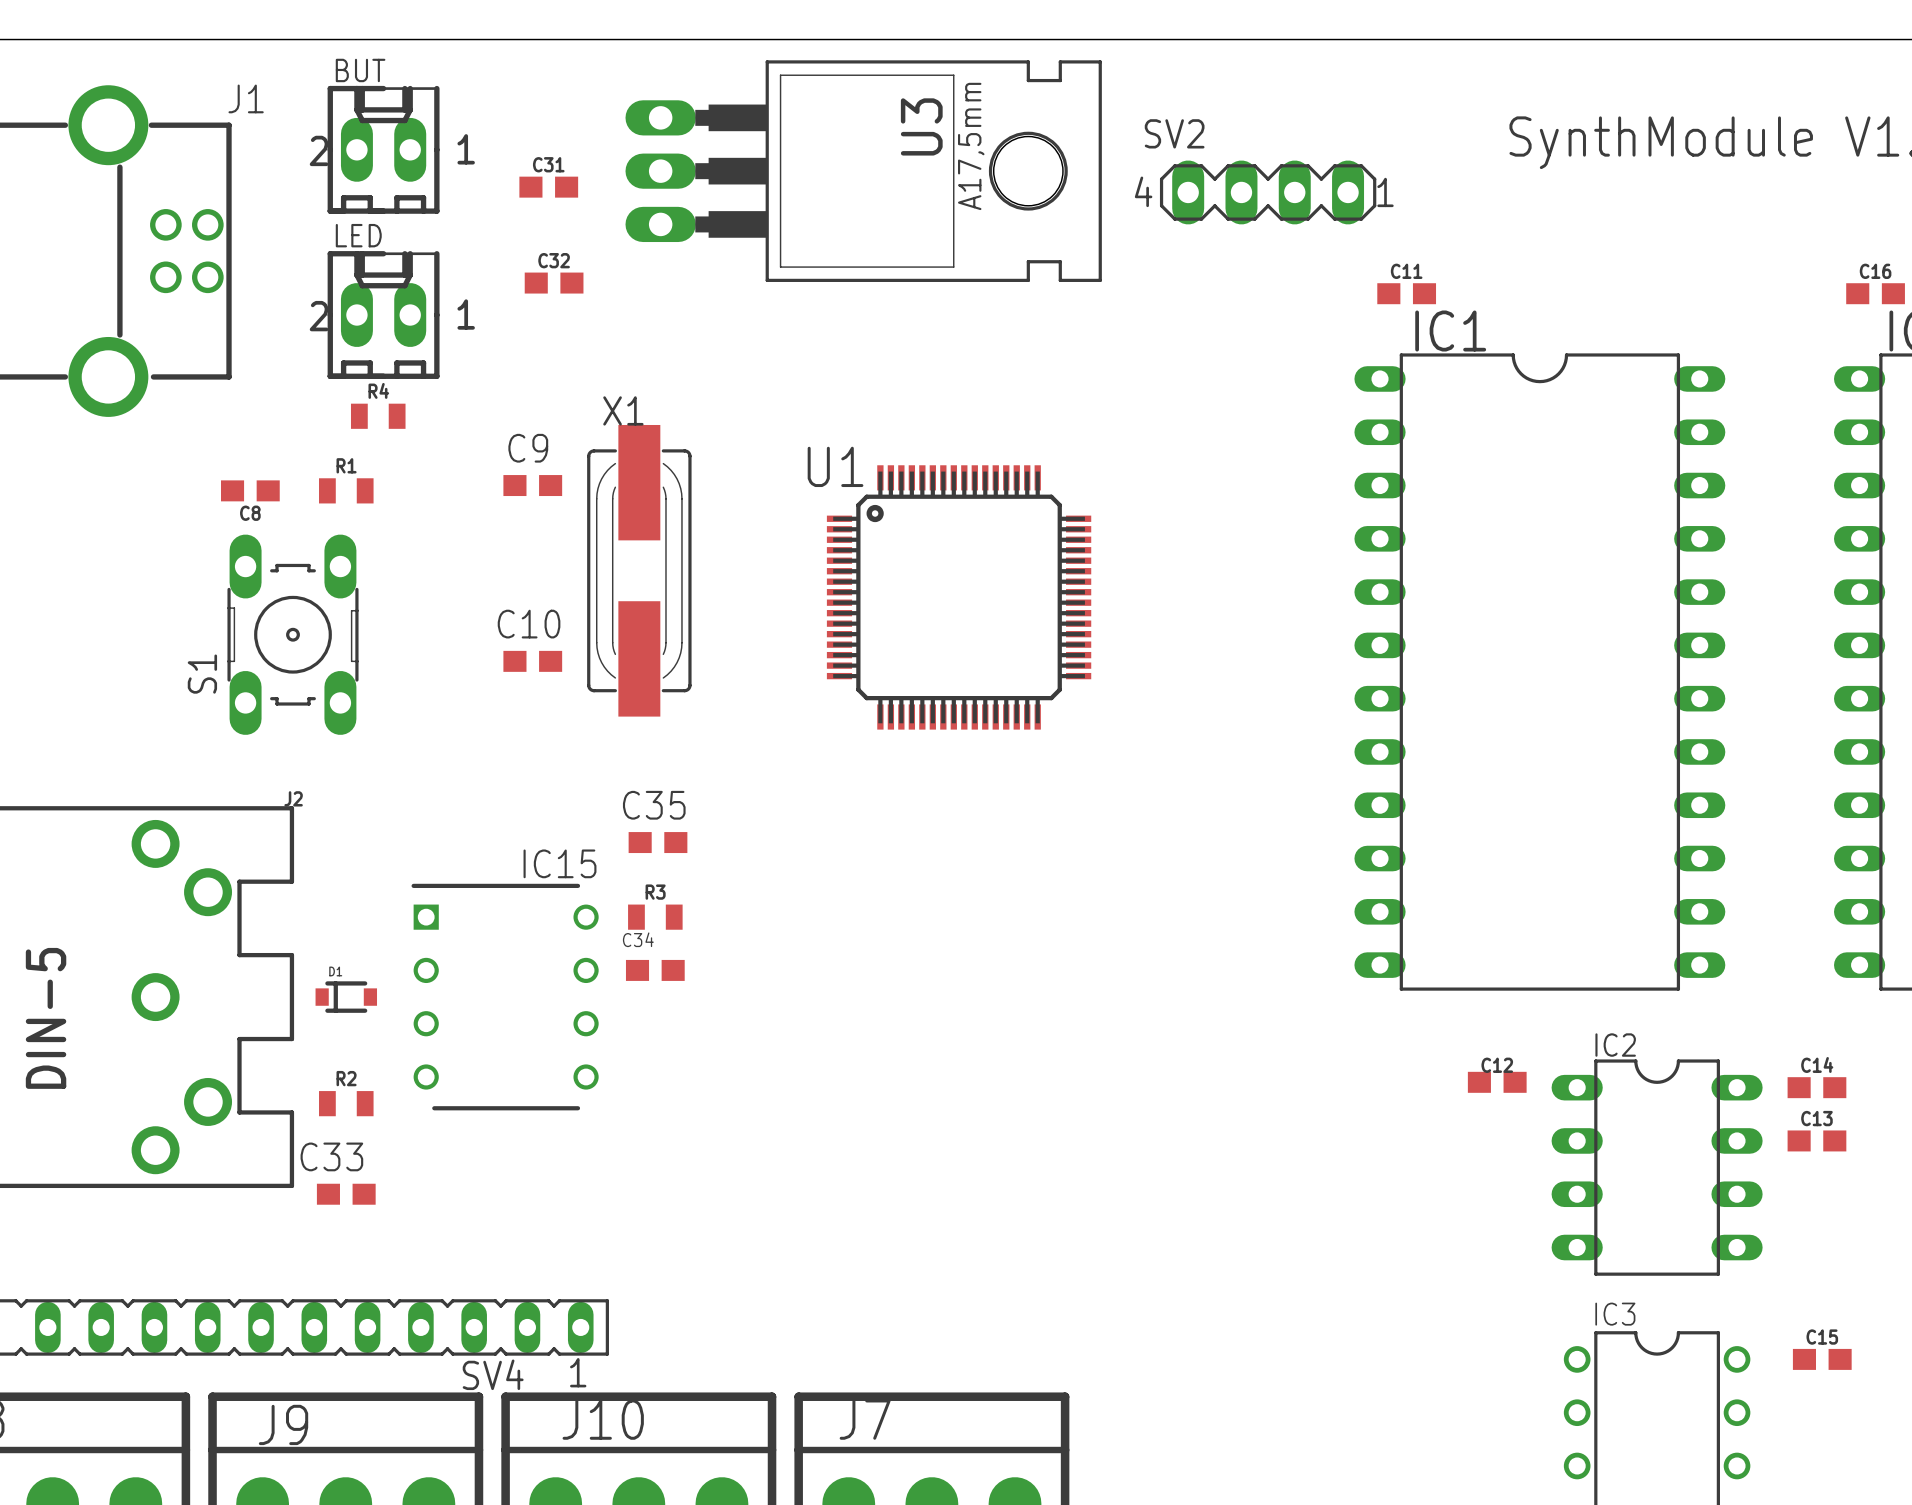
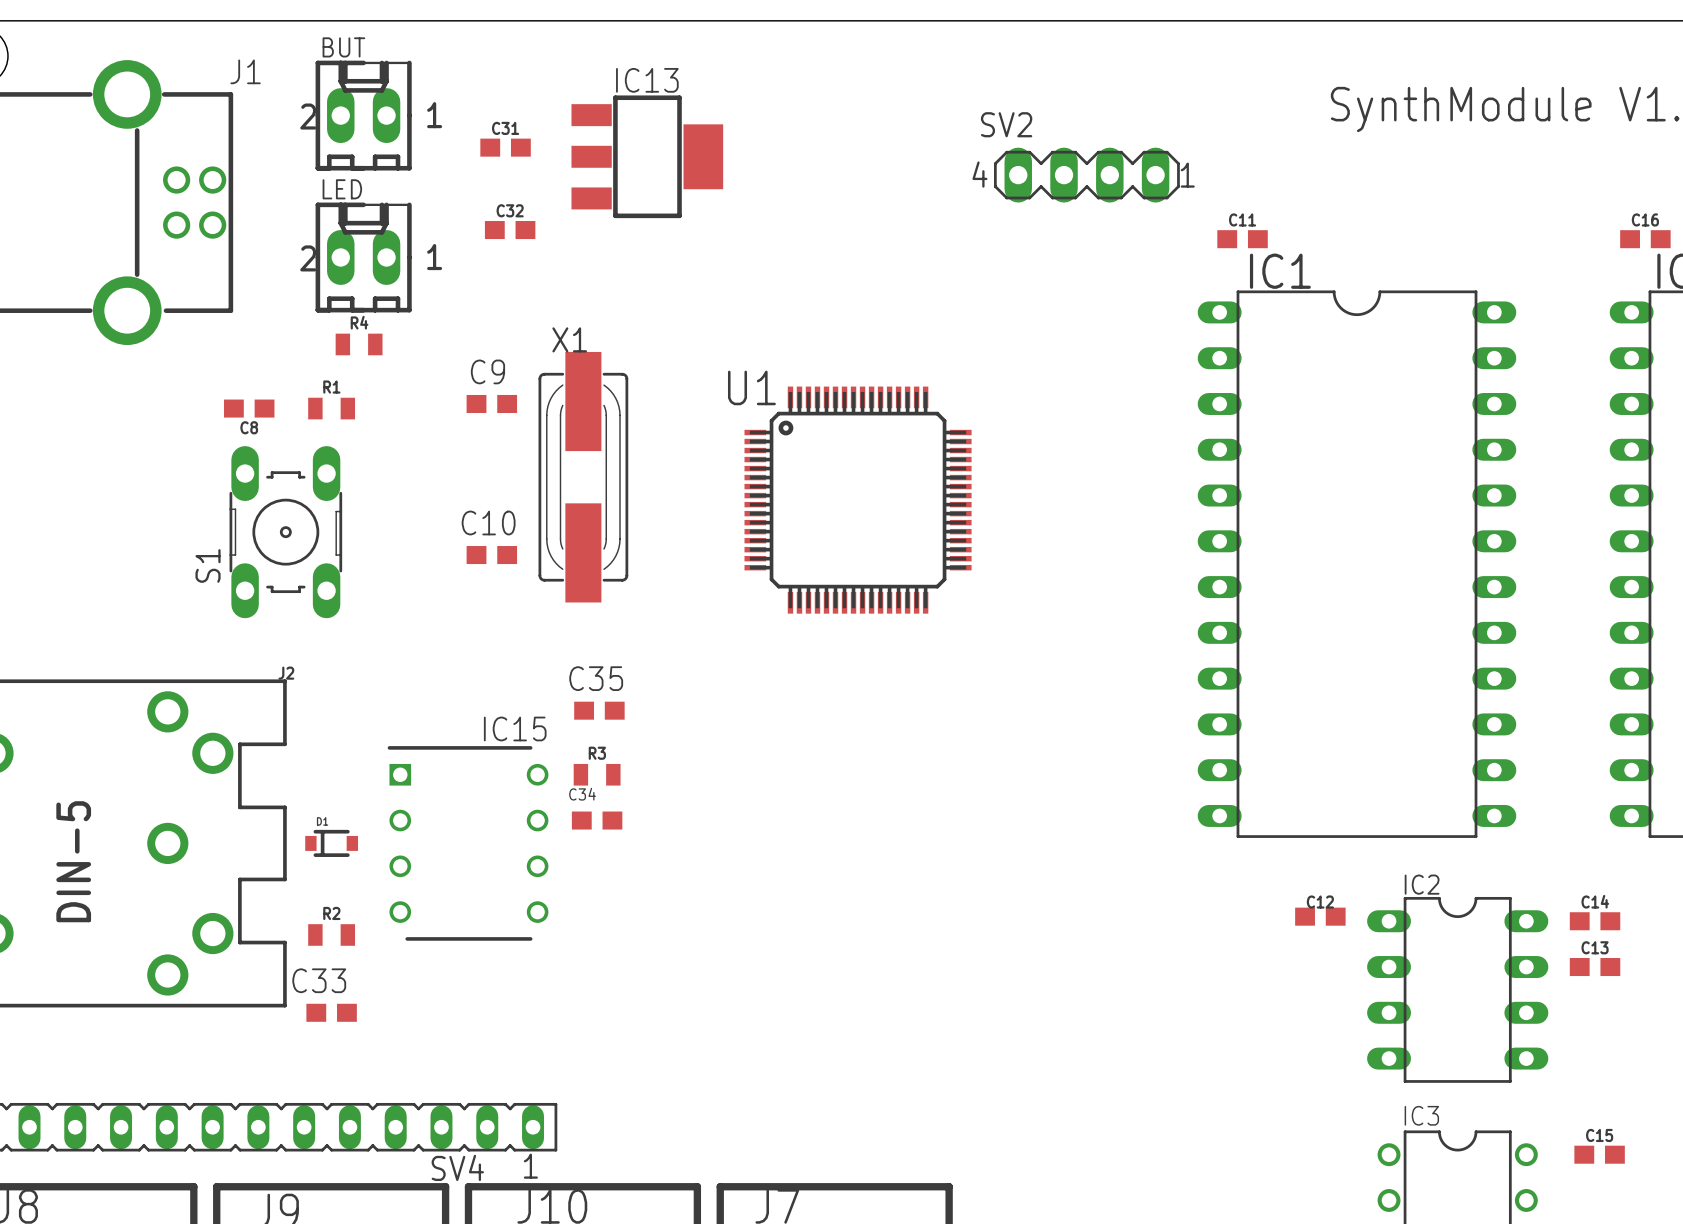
U3: (863, 171) -> none
SV2 position: (1268, 192) -> (1086, 175)
IC13: none -> (647, 156)

